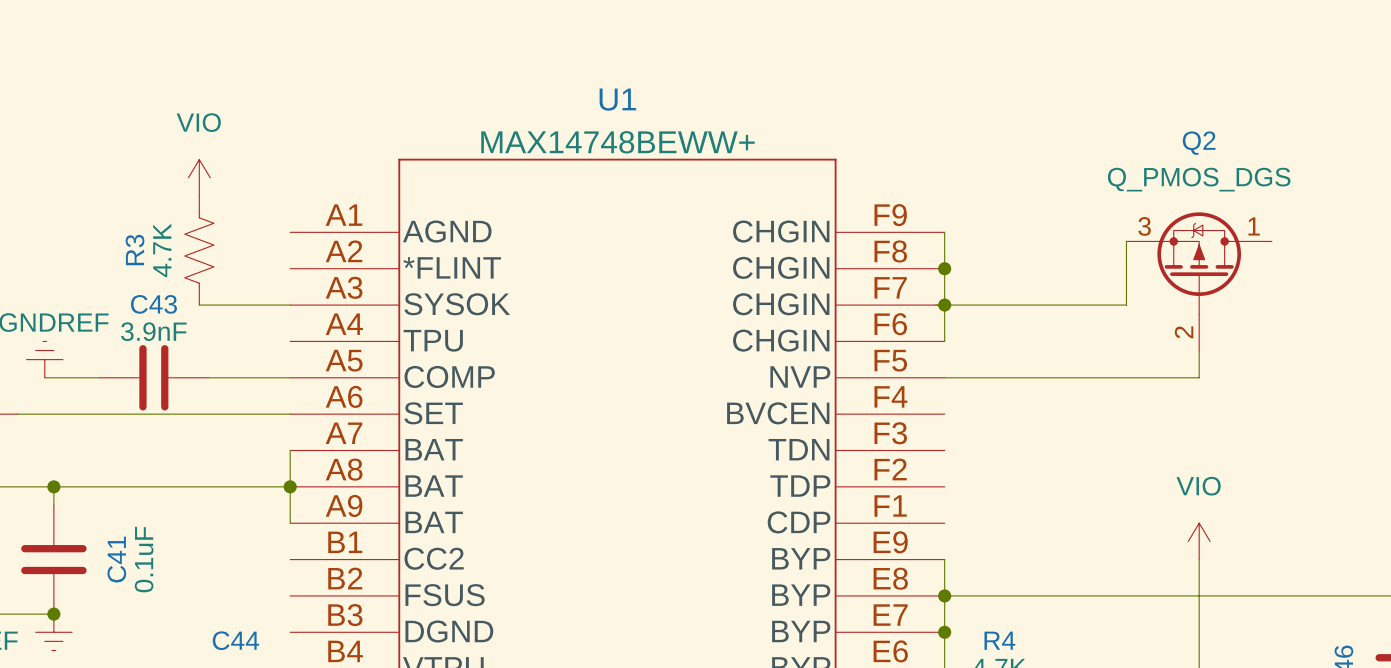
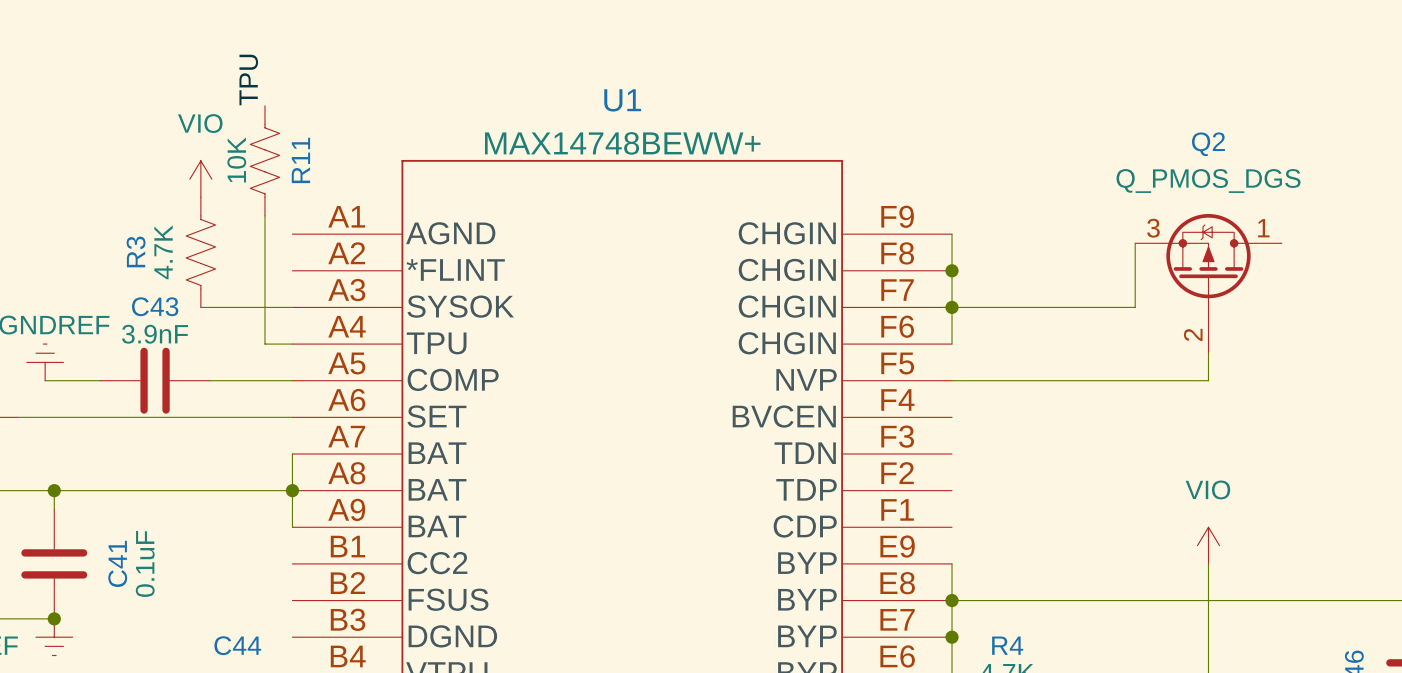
label: none -> TPU (248, 80)
R11: none -> 10K (264, 160)
wire: none -> (264, 215) (264, 344) (292, 344)

